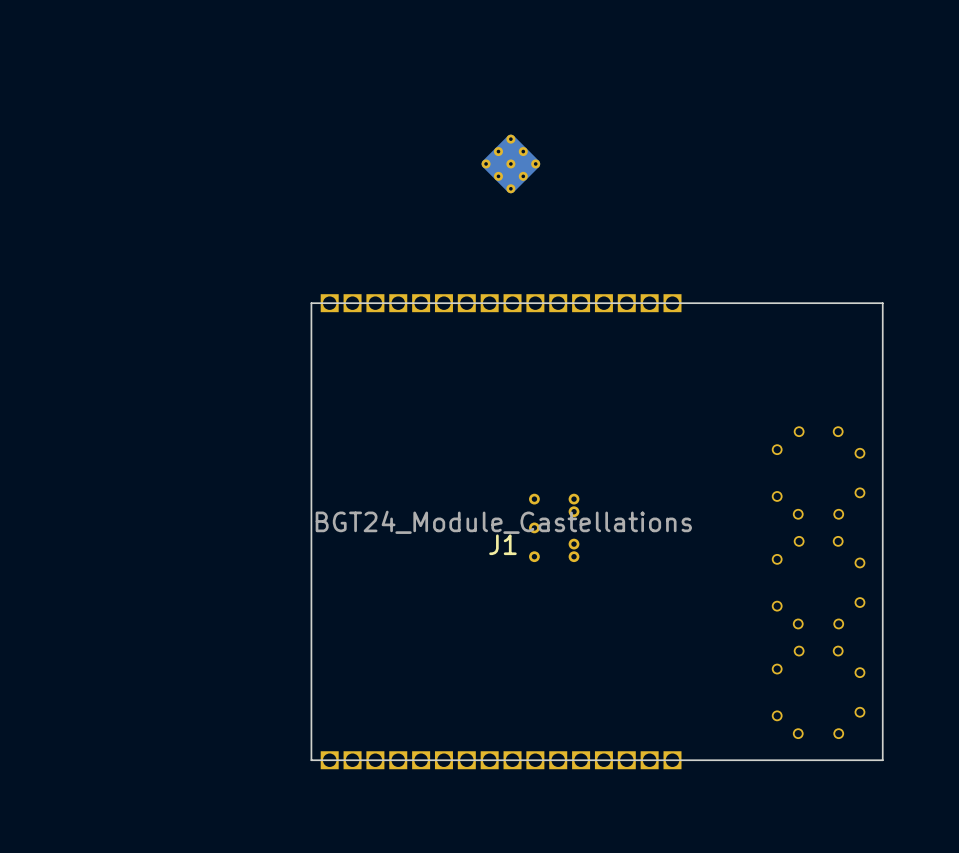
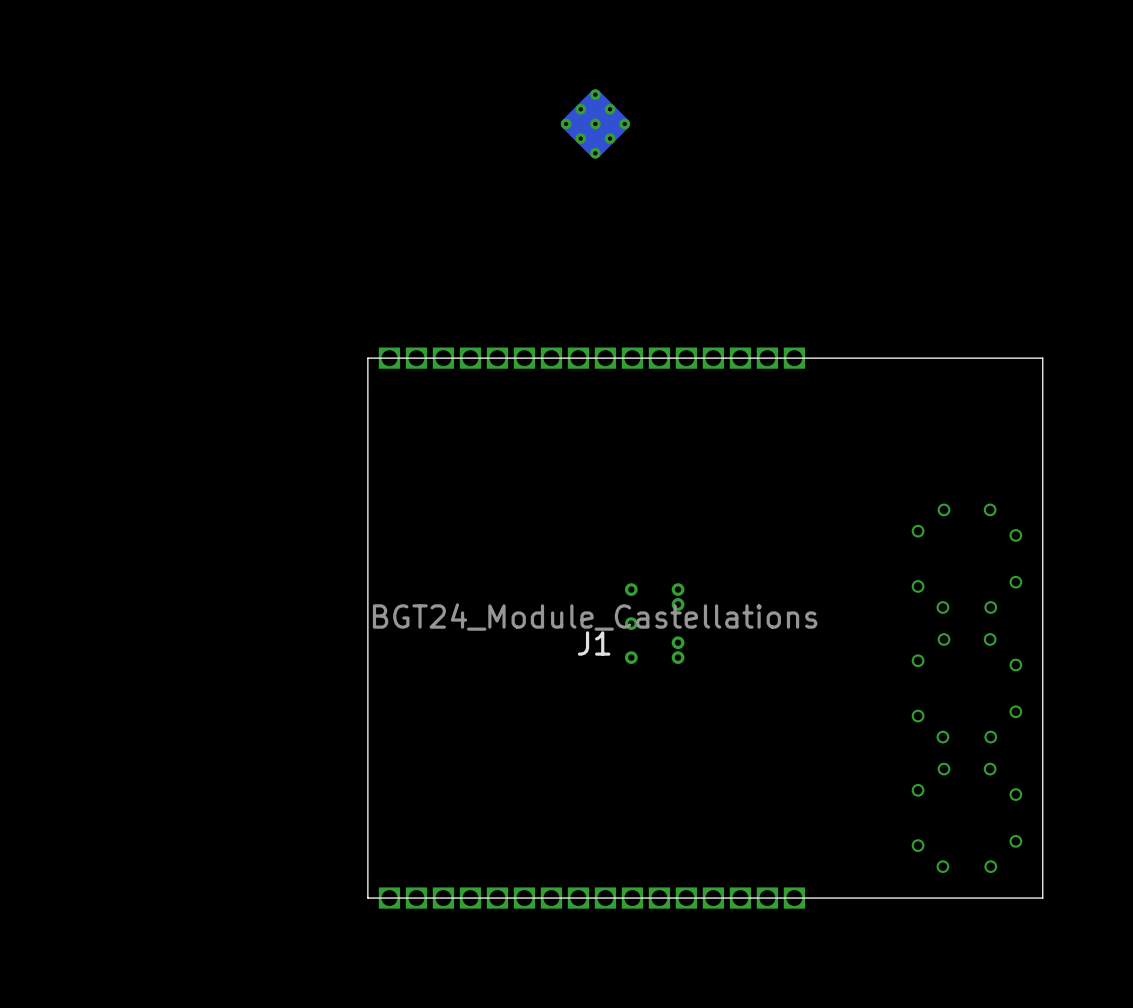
part position: (510, 163) -> (595, 123)

